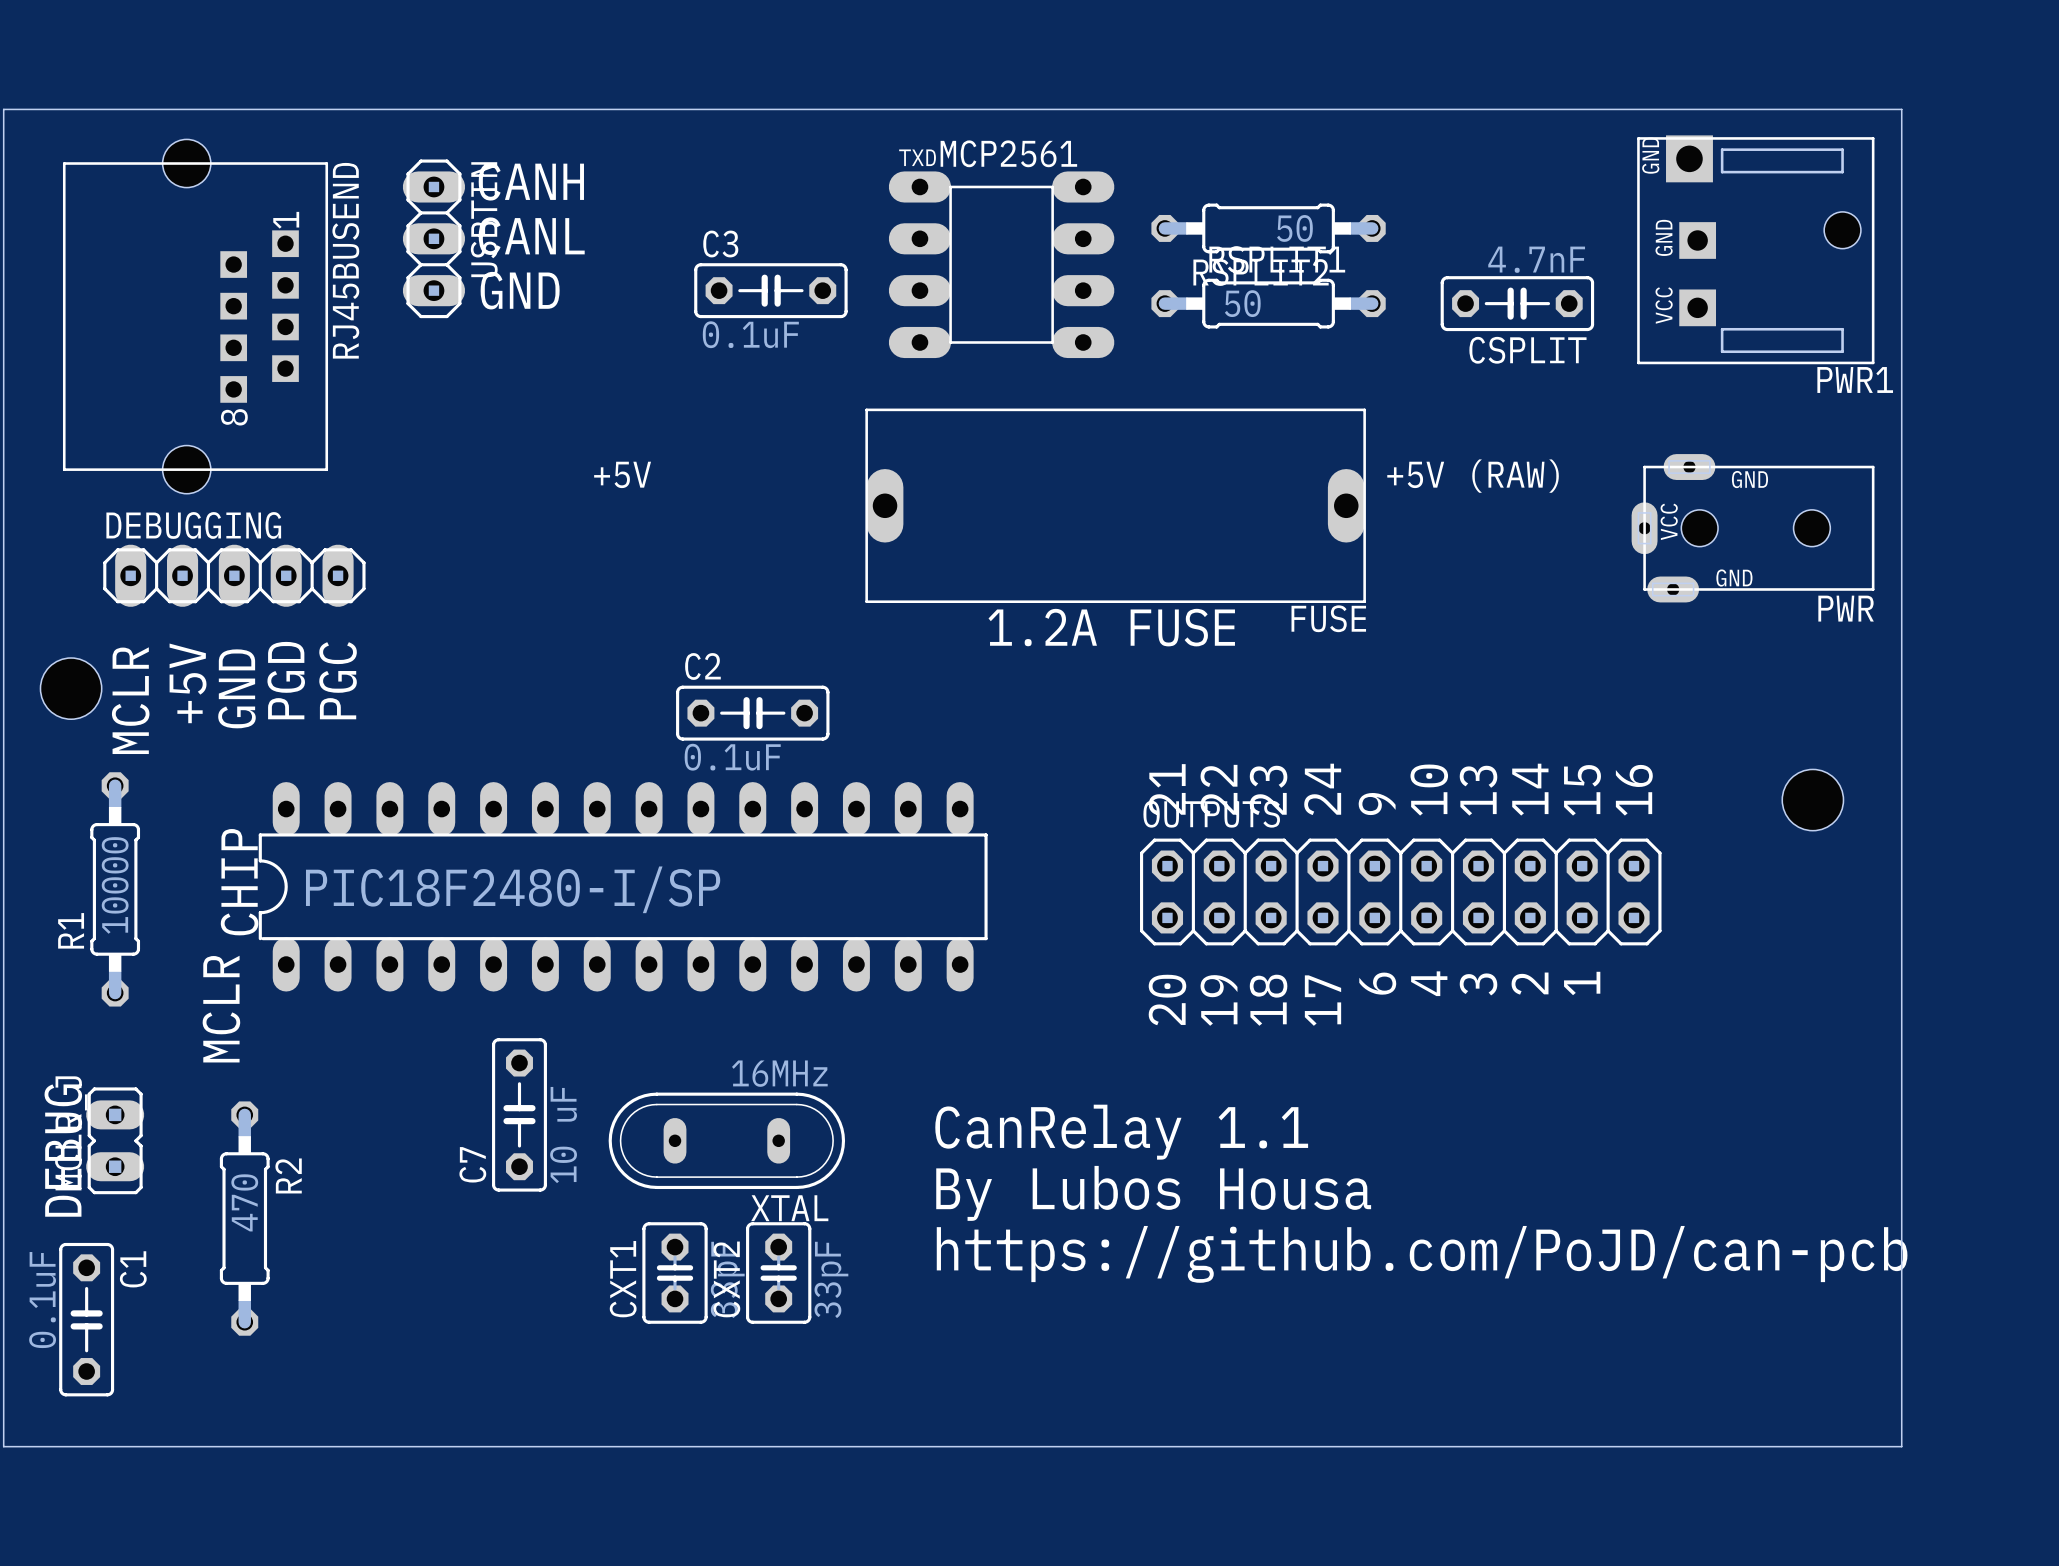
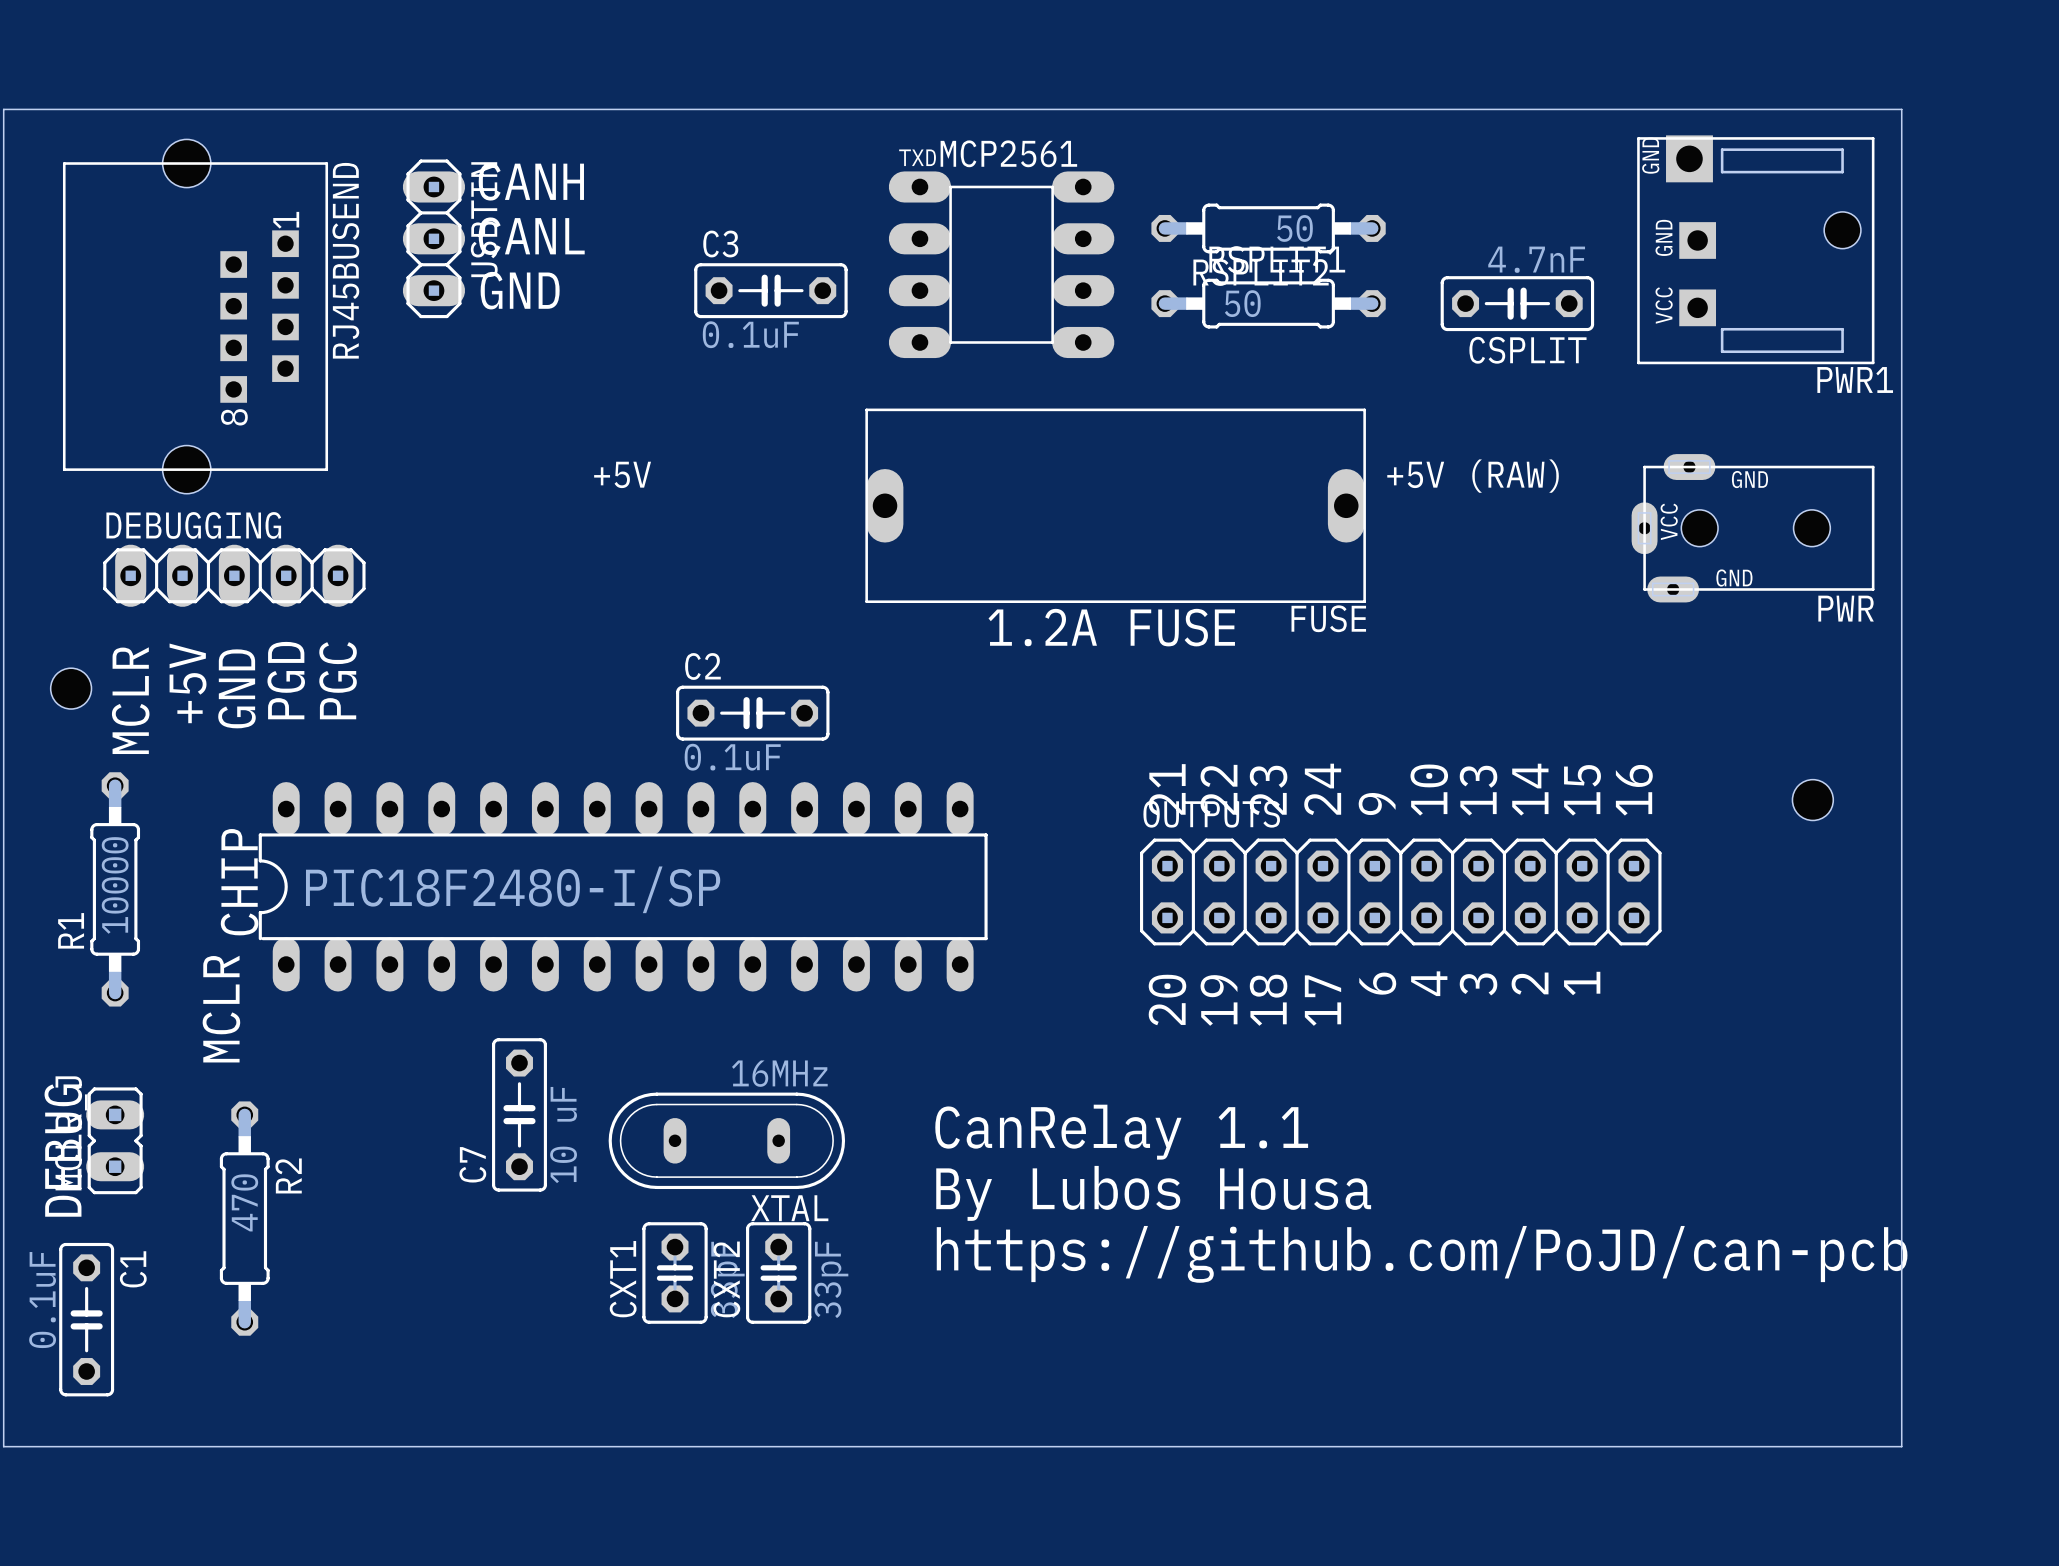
hole size: [40, 658, 102, 720] -> [50, 668, 92, 710]
hole size: [1782, 769, 1844, 831] -> [1792, 779, 1834, 821]

